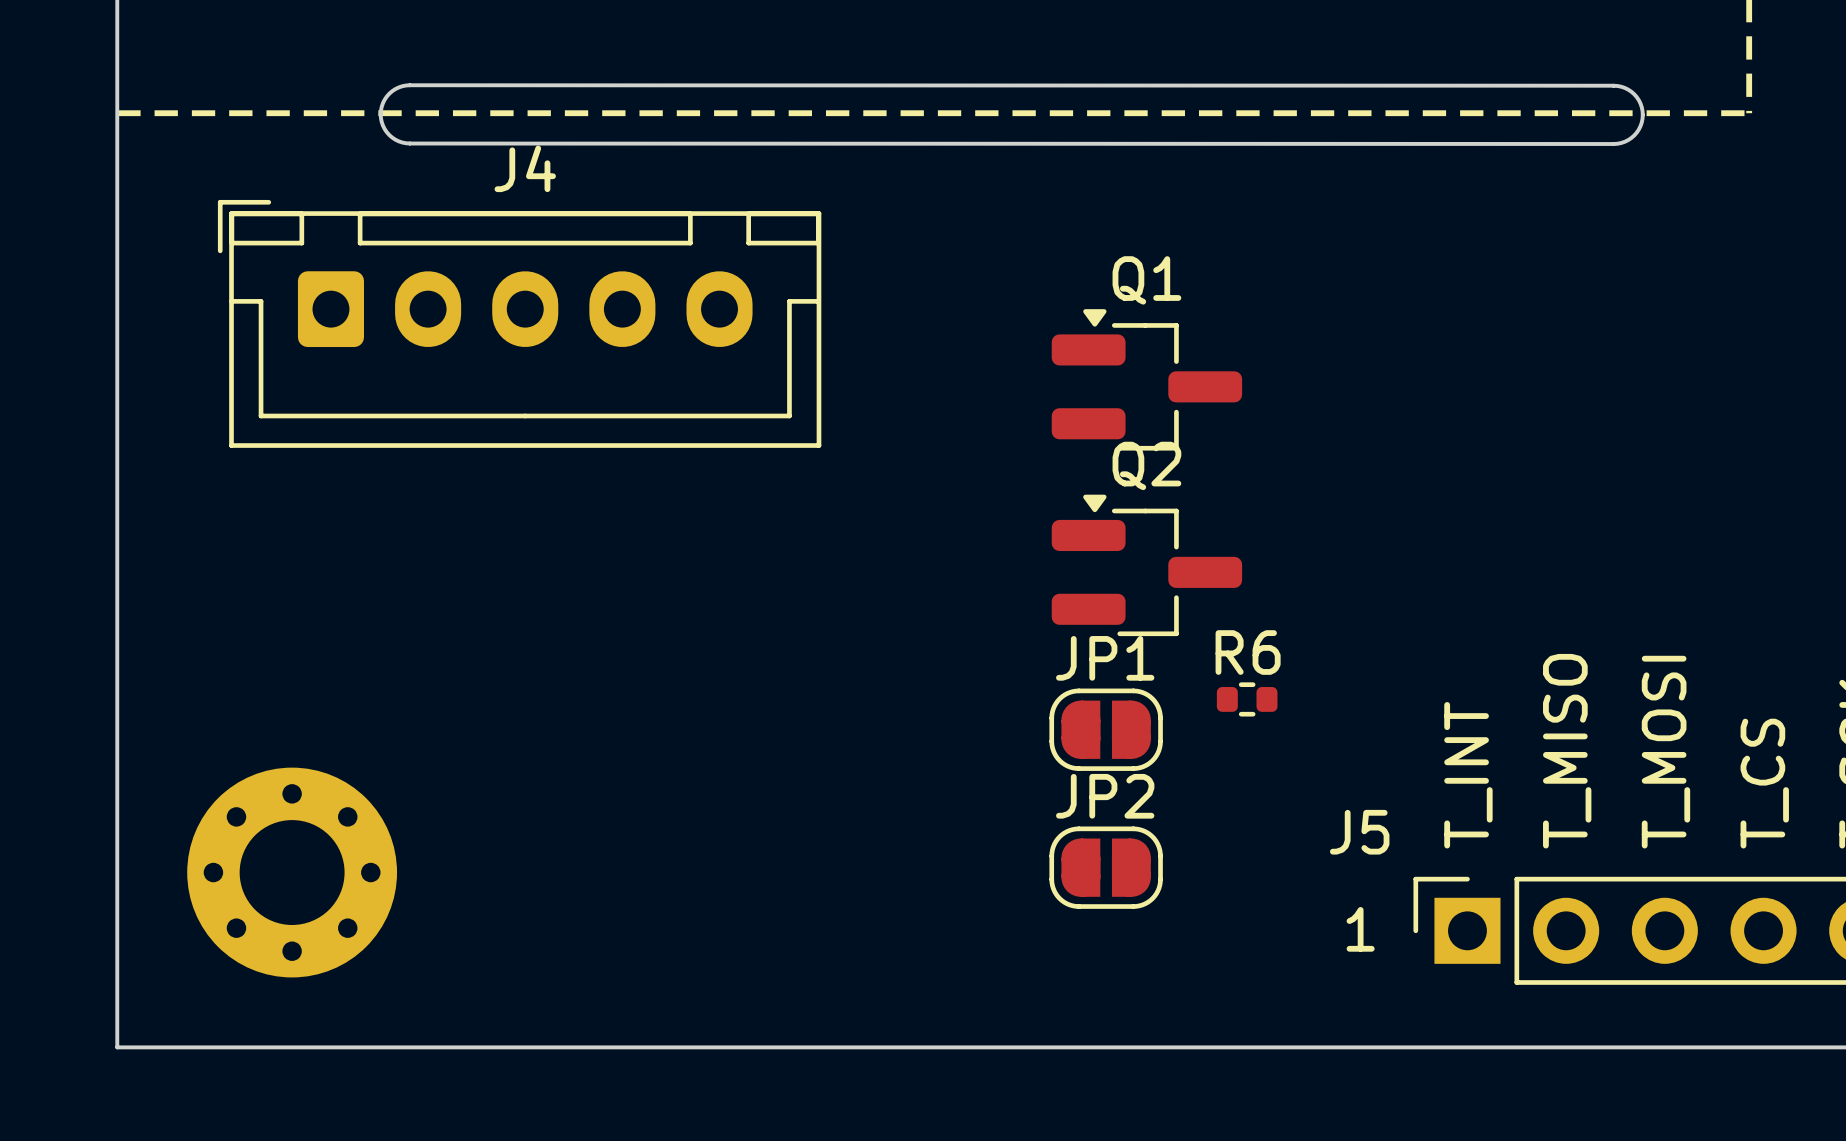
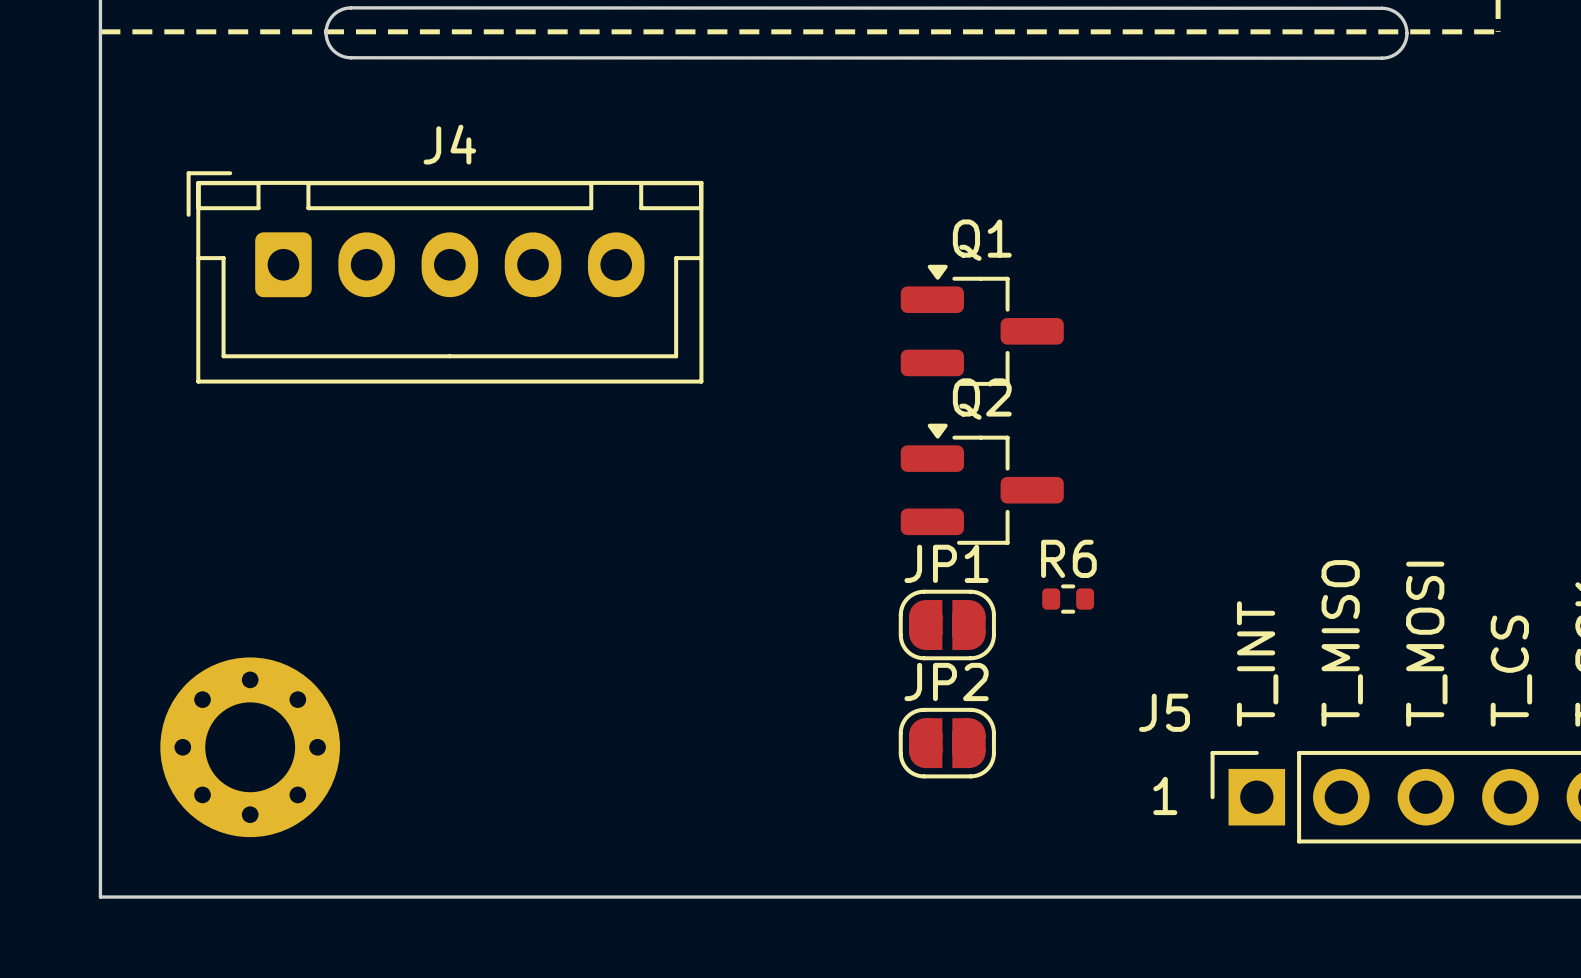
line: (1749, 37) (1749, 113) (117, 113) -> (1498, 31) (100, 31)
board edge: (409, 85) (1613, 85) (1624, 87) (1634, 94) (1640, 103) (1642, 114) (1640, 126) (1634, 135) (1624, 141) (1613, 144) (409, 143) (398, 141) (389, 134) (382, 125) (380, 114) (382, 103) (389, 93) (398, 87) (409, 85) -> (351, 7) (1382, 8) (1391, 10) (1399, 15) (1405, 23) (1406, 33) (1405, 42) (1399, 50) (1391, 56) (1382, 58) (351, 57) (341, 55) (333, 50) (327, 42) (326, 32) (327, 23) (333, 15) (341, 9) (351, 7)

